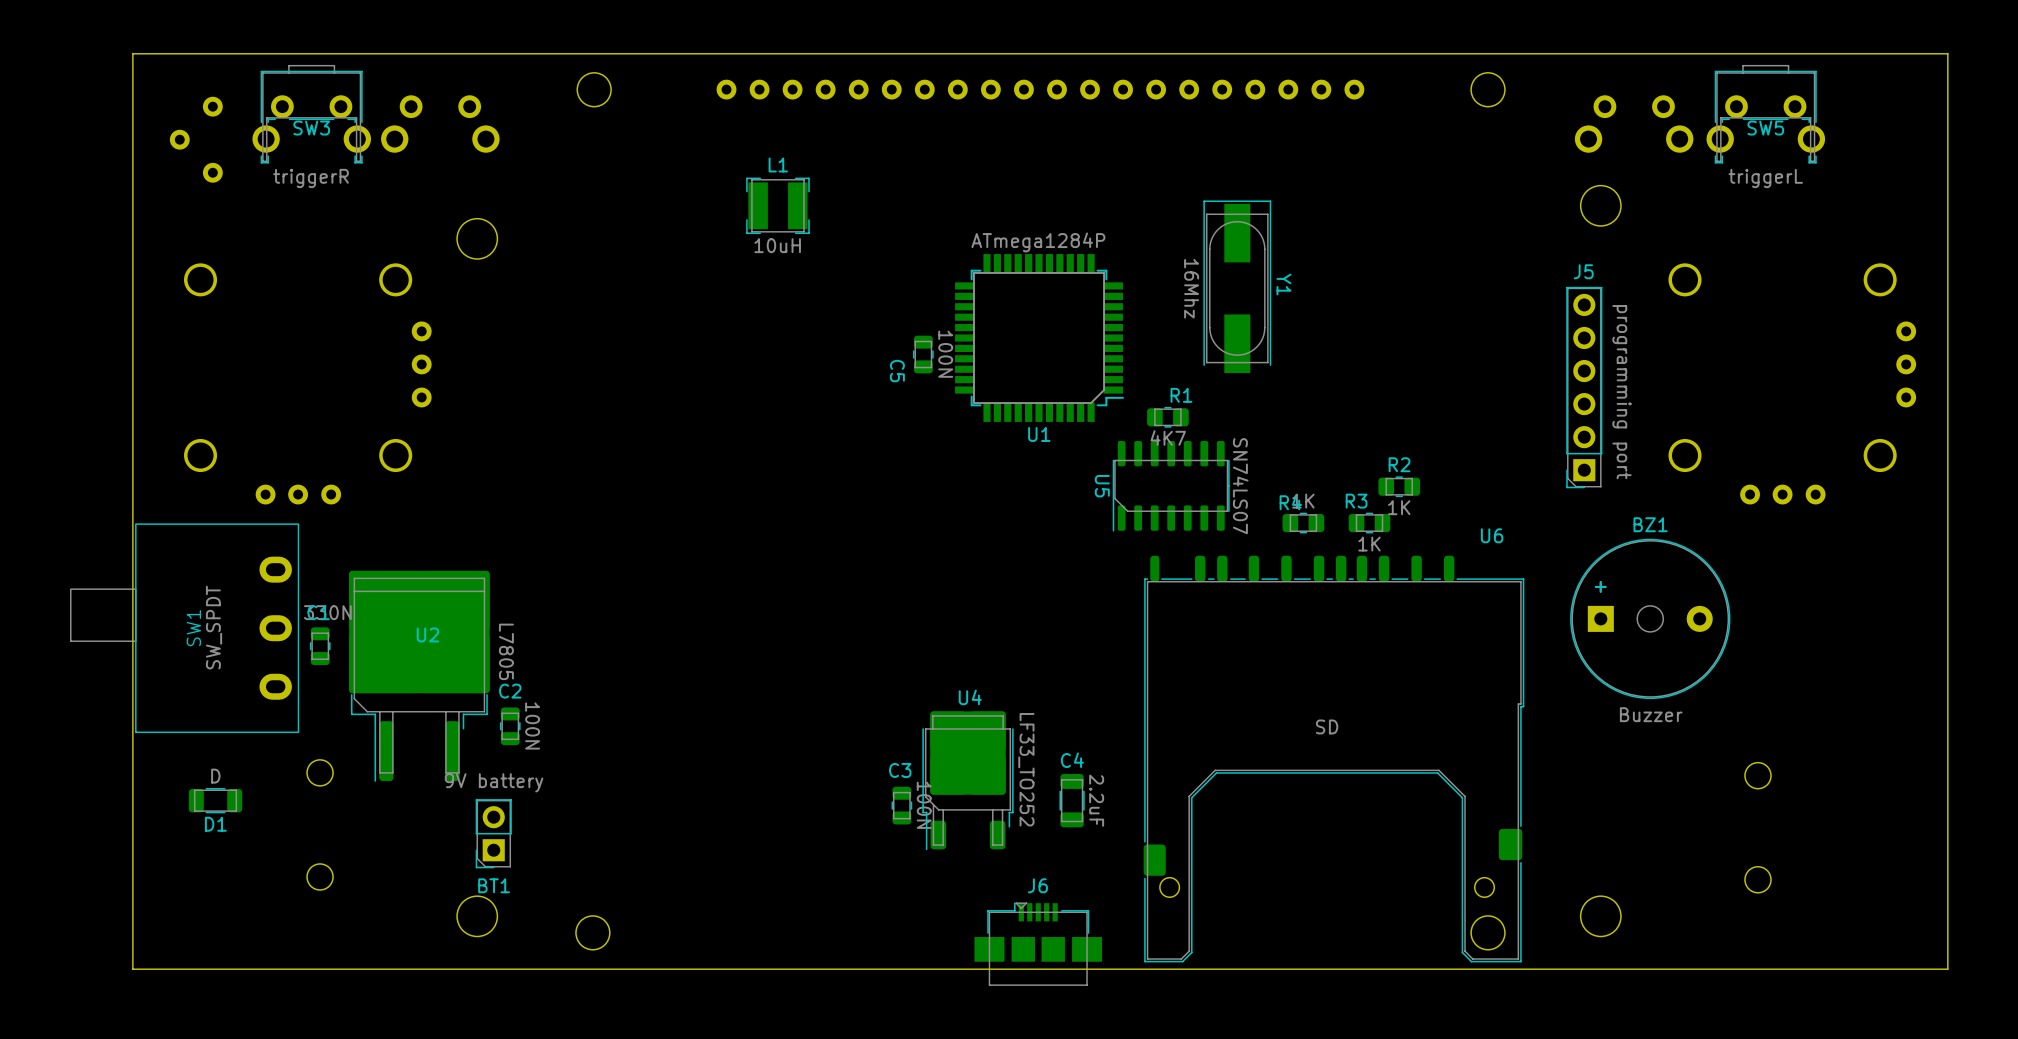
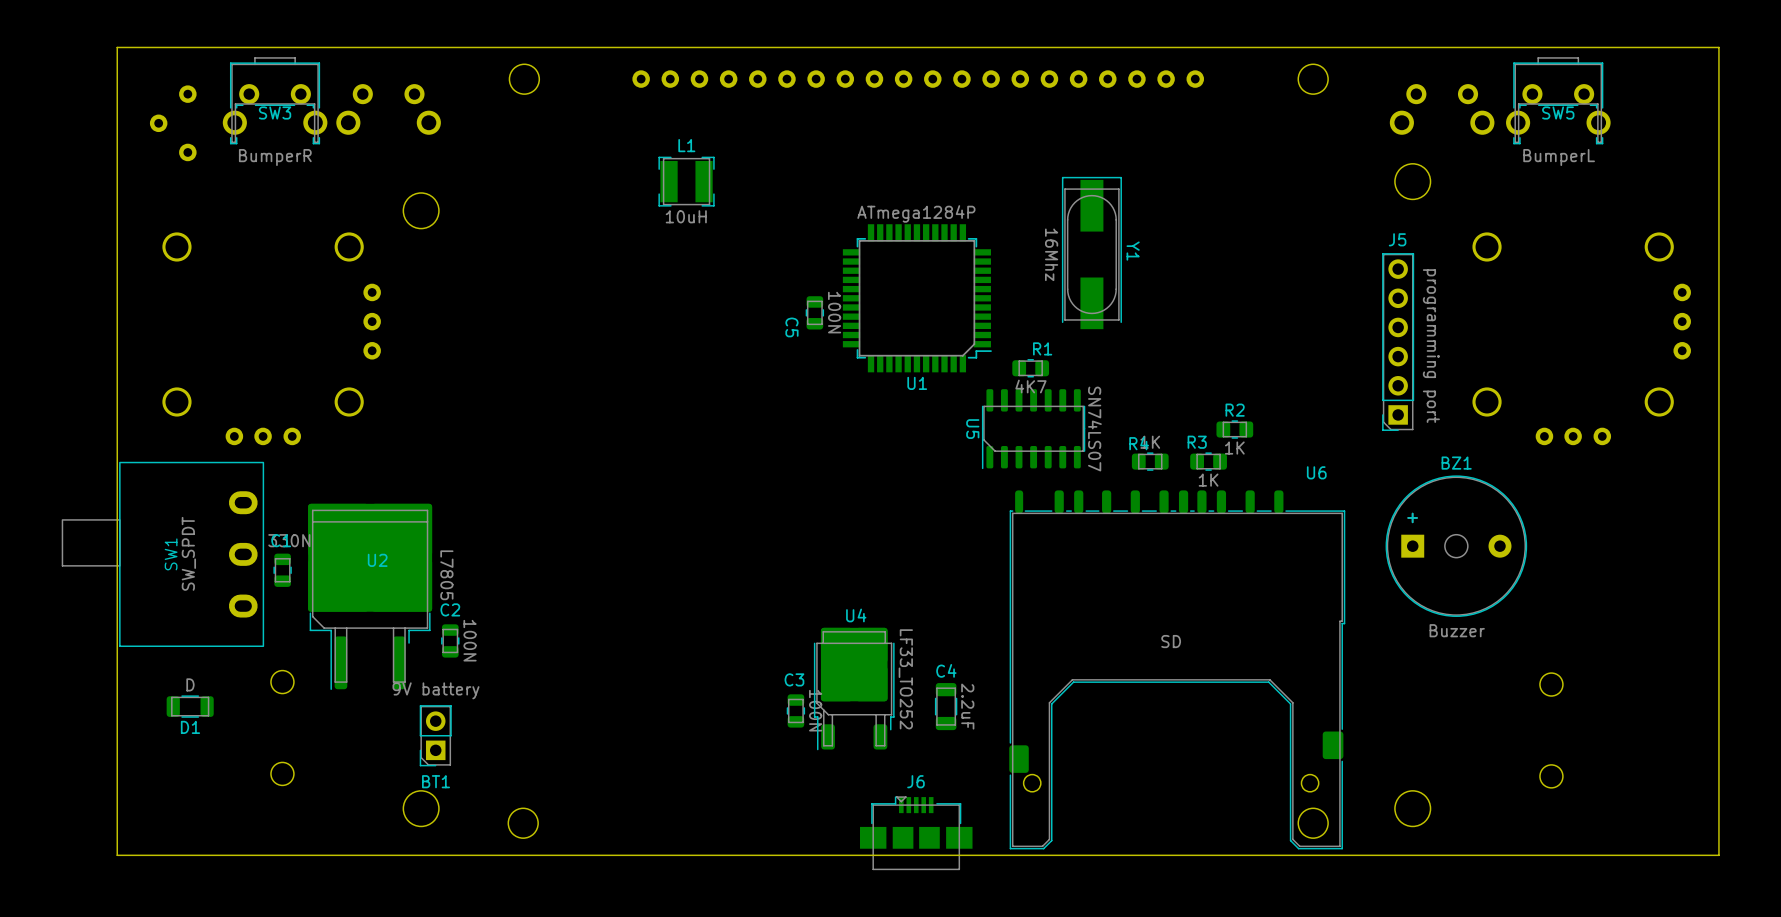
SW3 value: triggerR (311, 178) -> BumperR (275, 157)
SW5 value: triggerL (1765, 178) -> BumperL (1559, 157)

